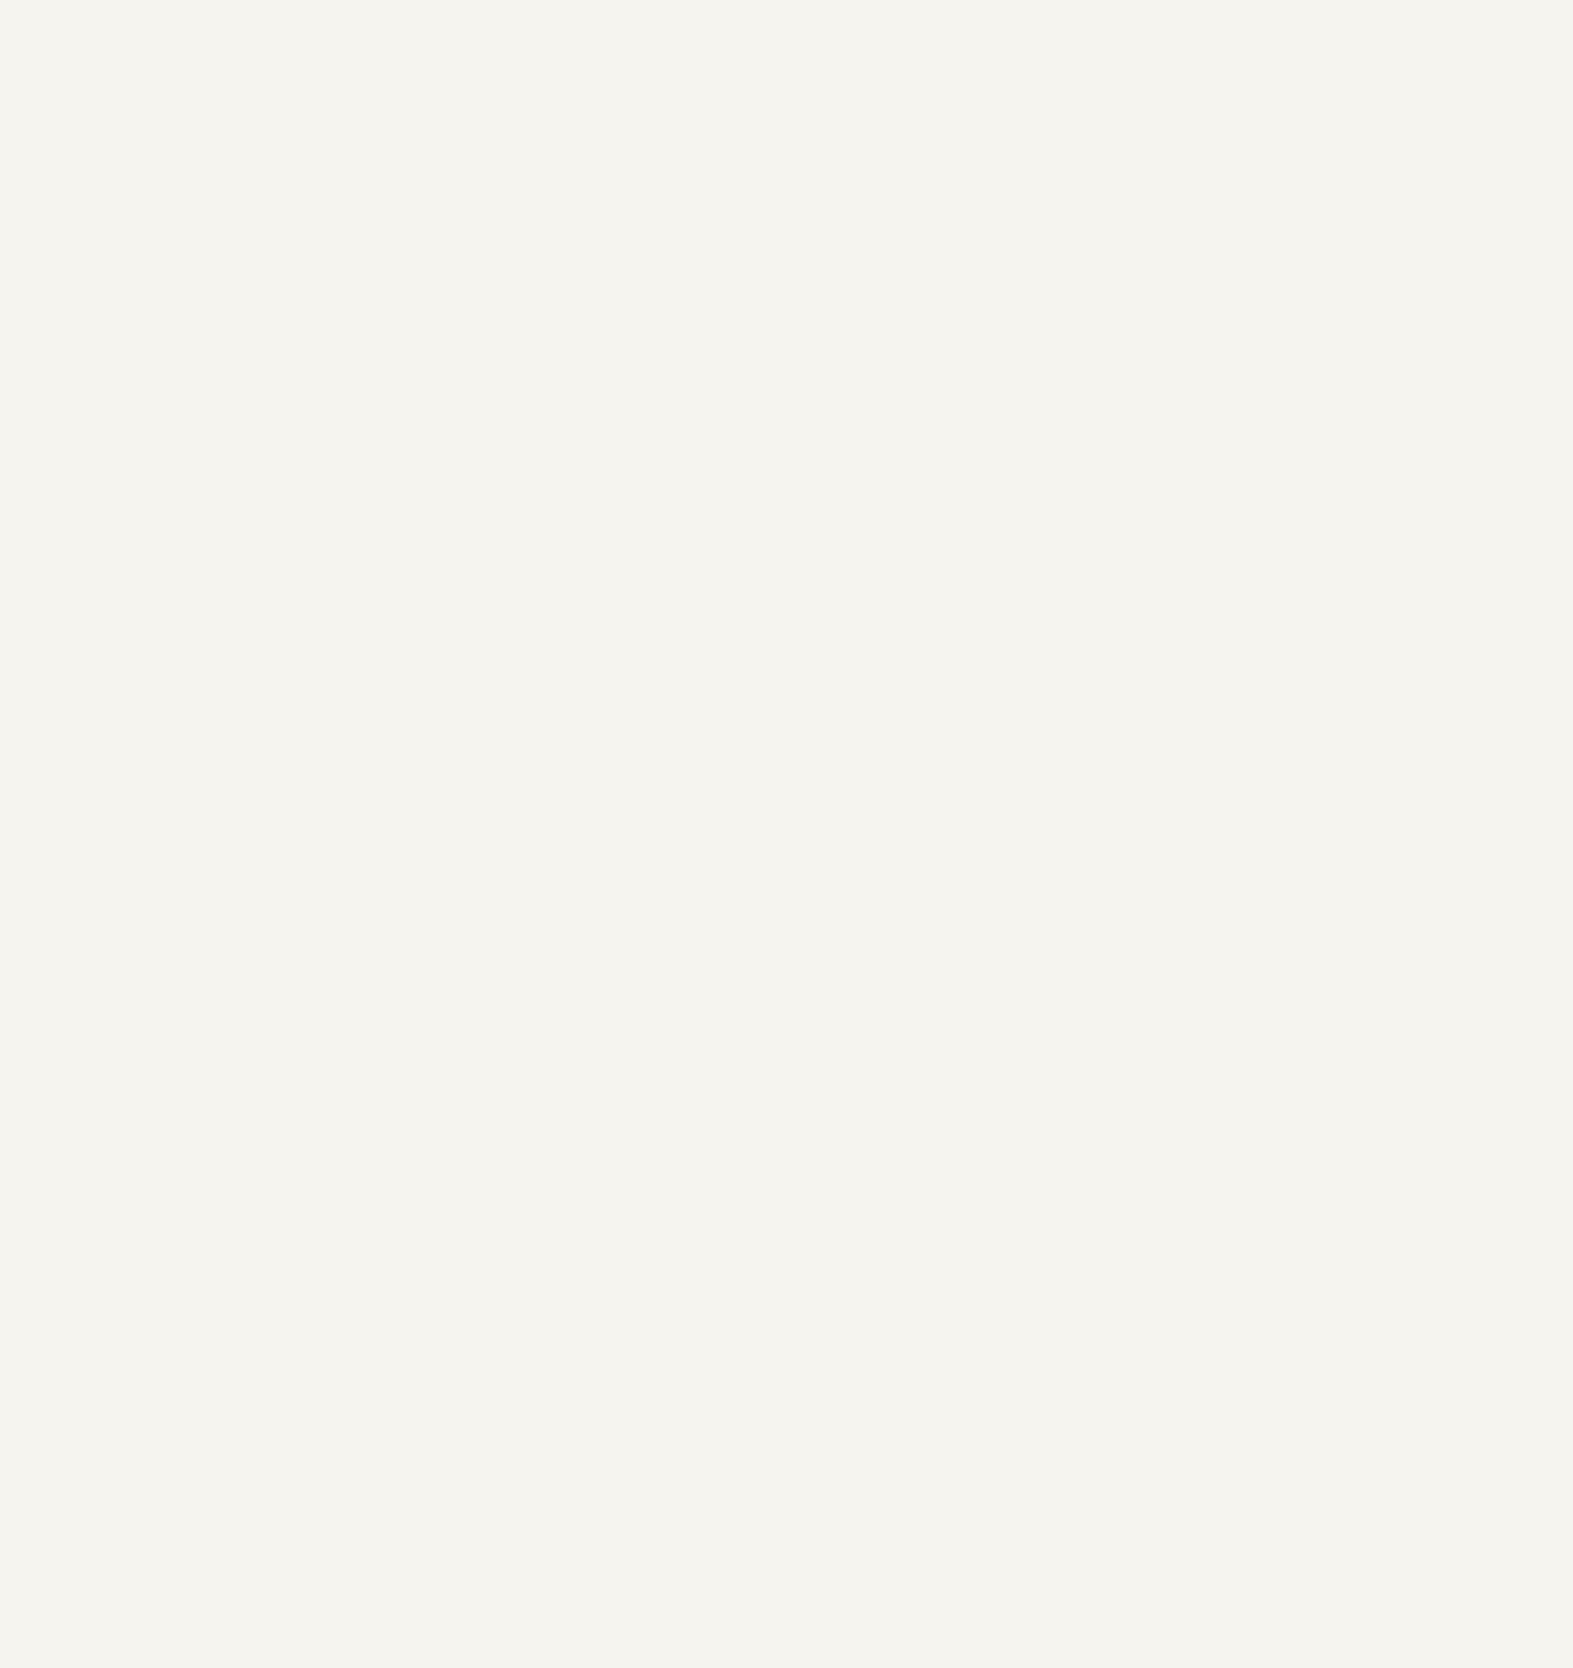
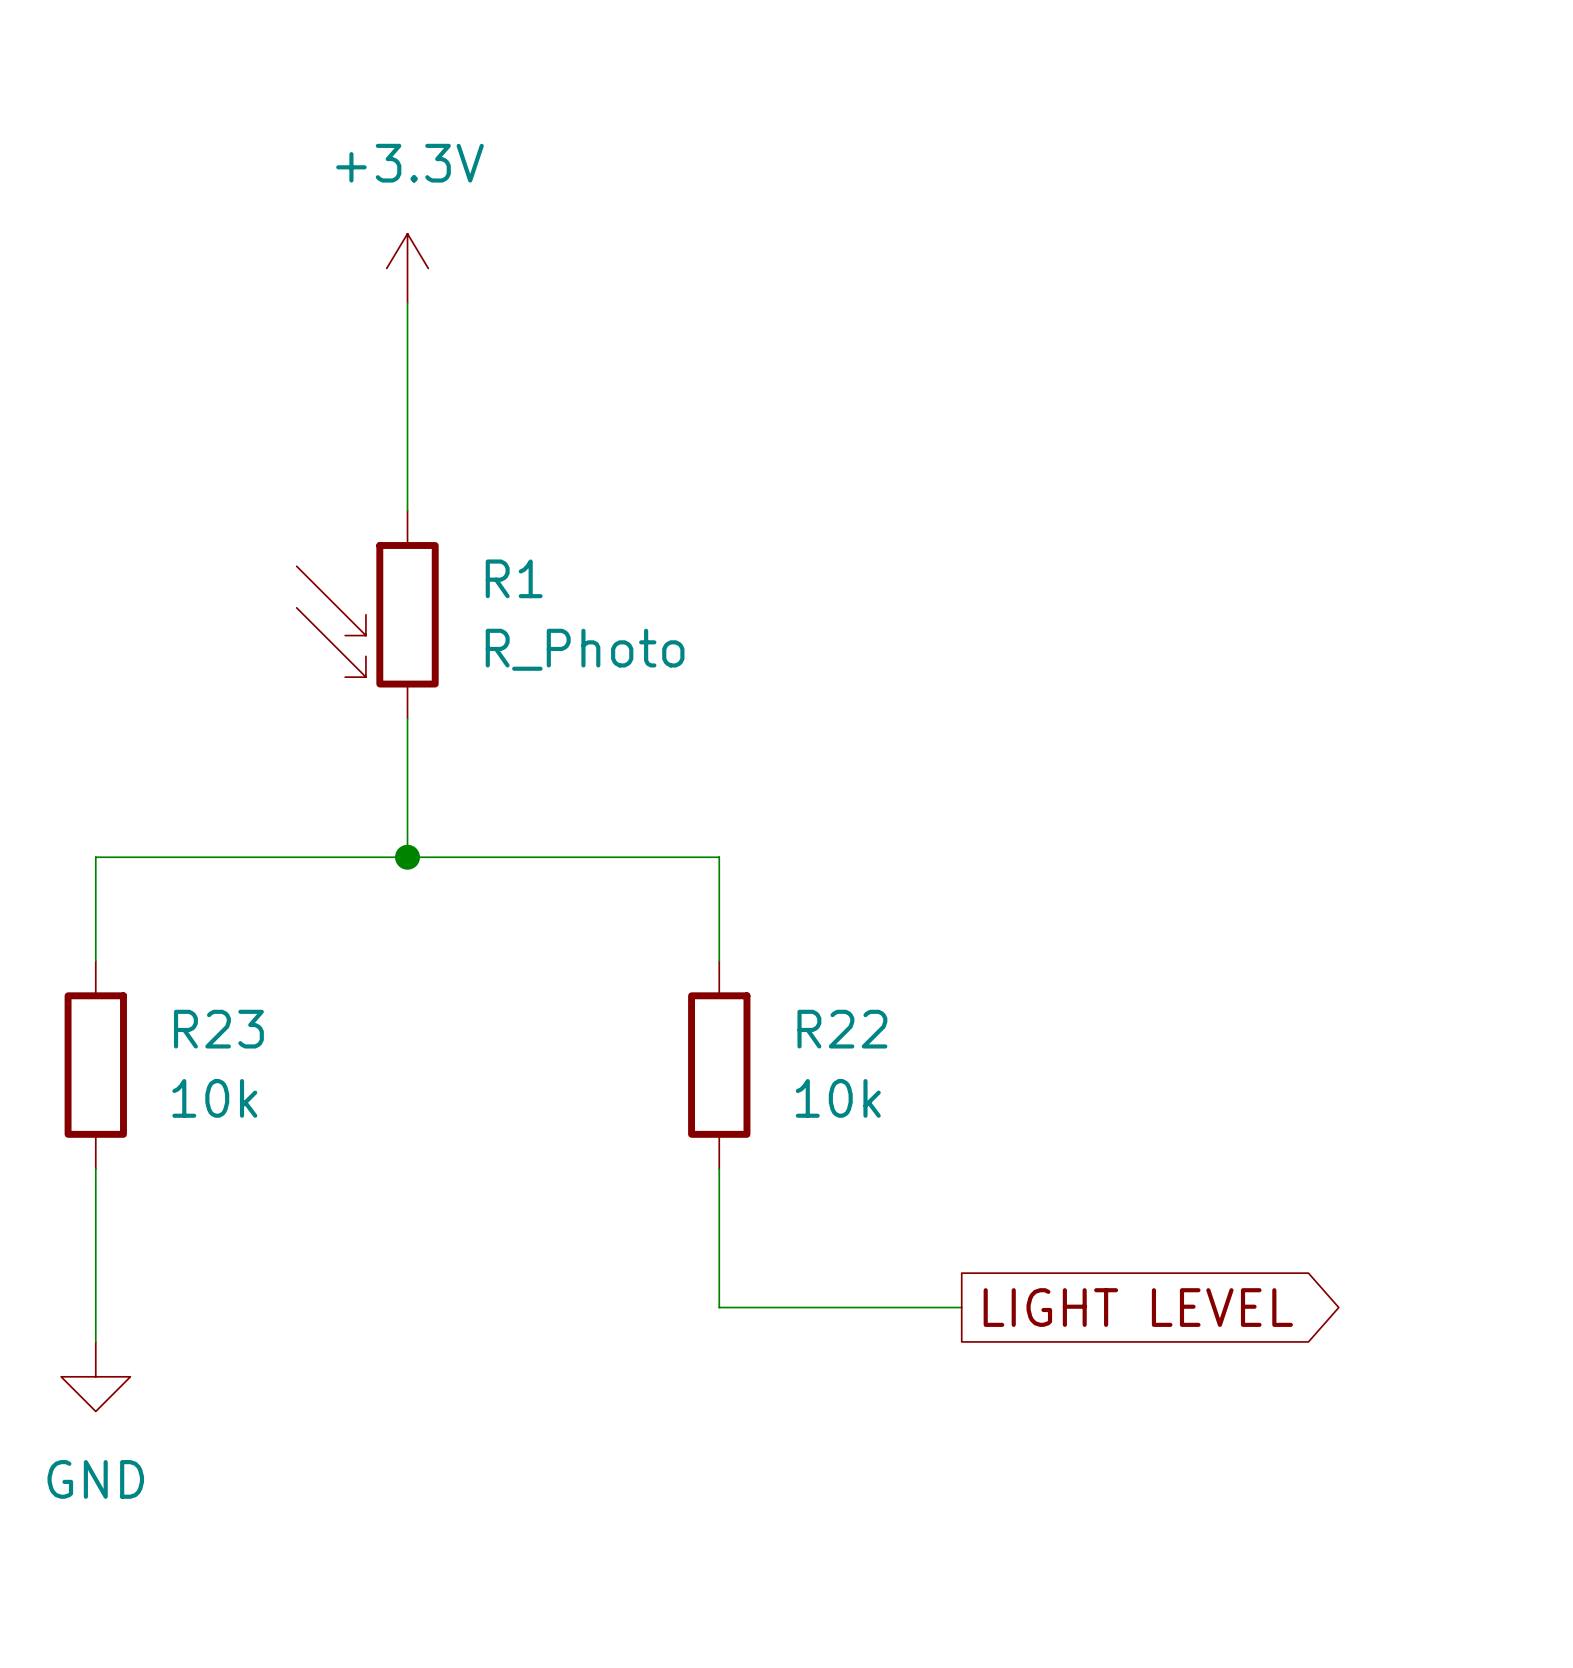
power symbol: none -> +3.3V (407, 268)
wire: none -> (407, 303) (407, 510)
R1: none -> R_Photo (367, 614)
wire: none -> (407, 718) (407, 857)
junction: none -> (407, 857)
wire: none -> (95, 961) (95, 857) (719, 857) (719, 961)
R23: none -> 10k (95, 1065)
R22: none -> 10k (719, 1065)
wire: none -> (95, 1168) (95, 1342)
wire: none -> (719, 1168) (719, 1307) (961, 1307)
global label: none -> LIGHT LEVEL (1138, 1307)
power symbol: none -> GND (95, 1376)

